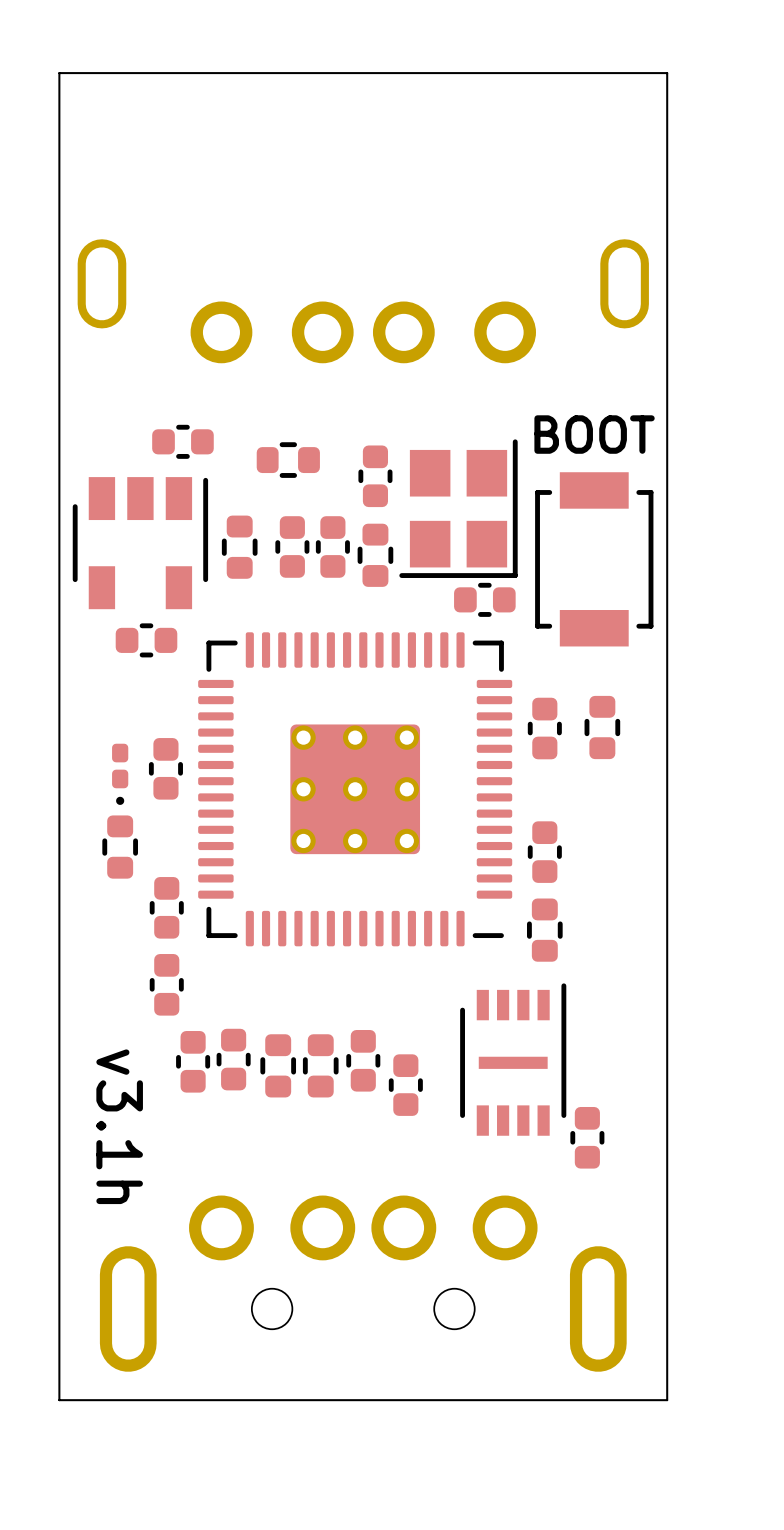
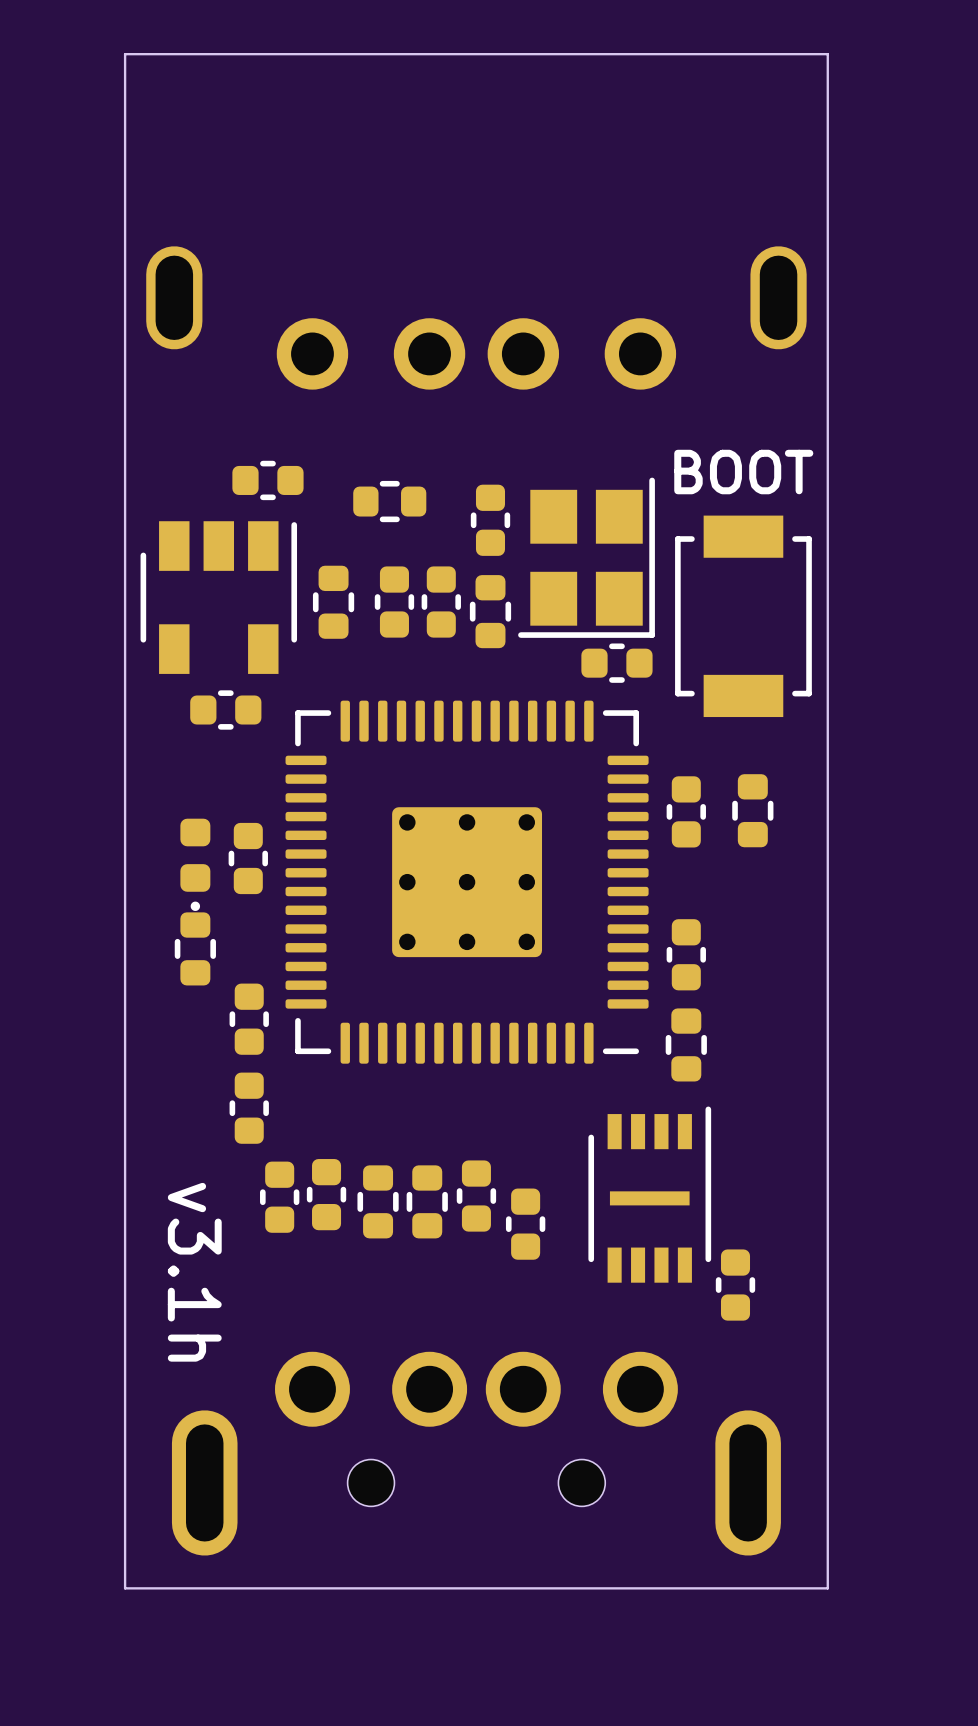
part footprint: [112, 743, 129, 805] -> [180, 818, 211, 911]

